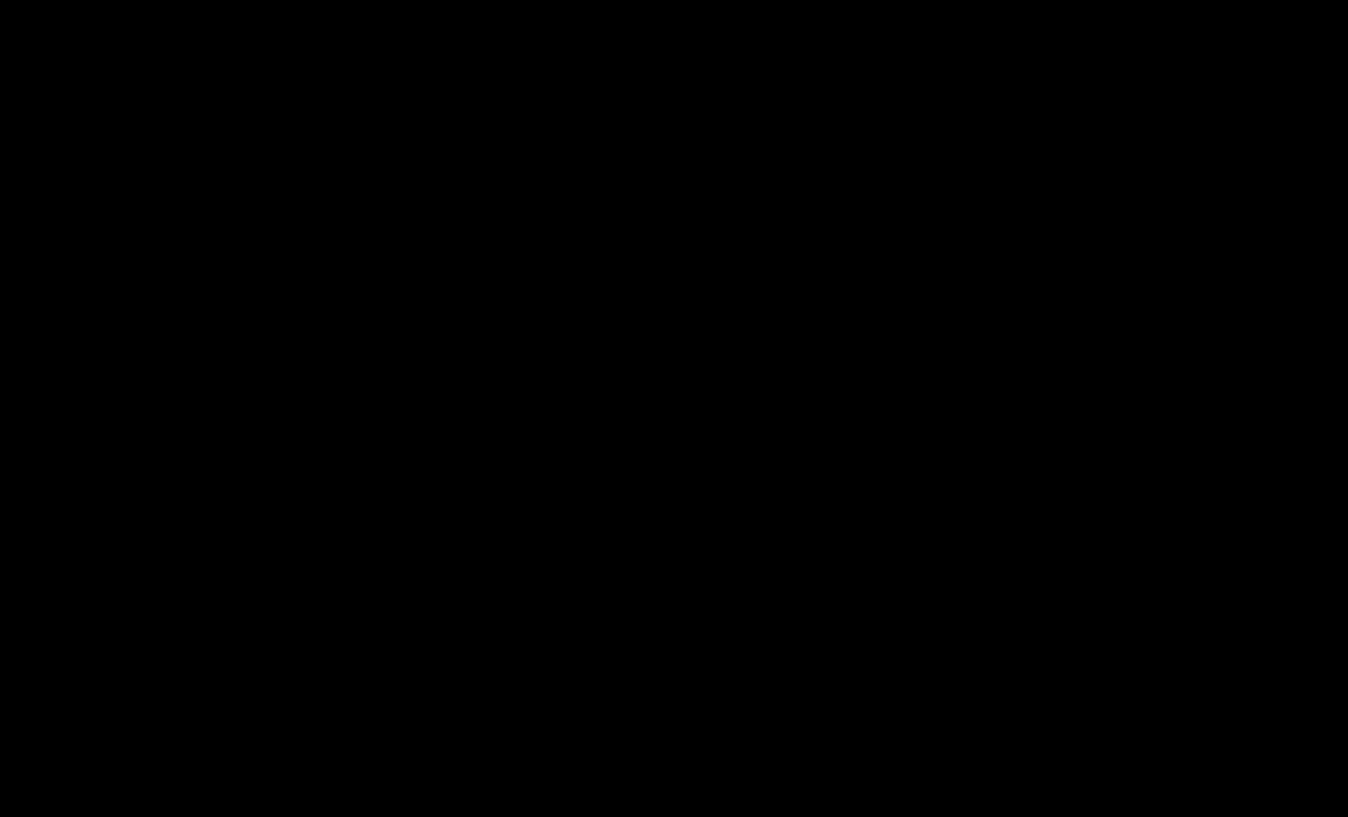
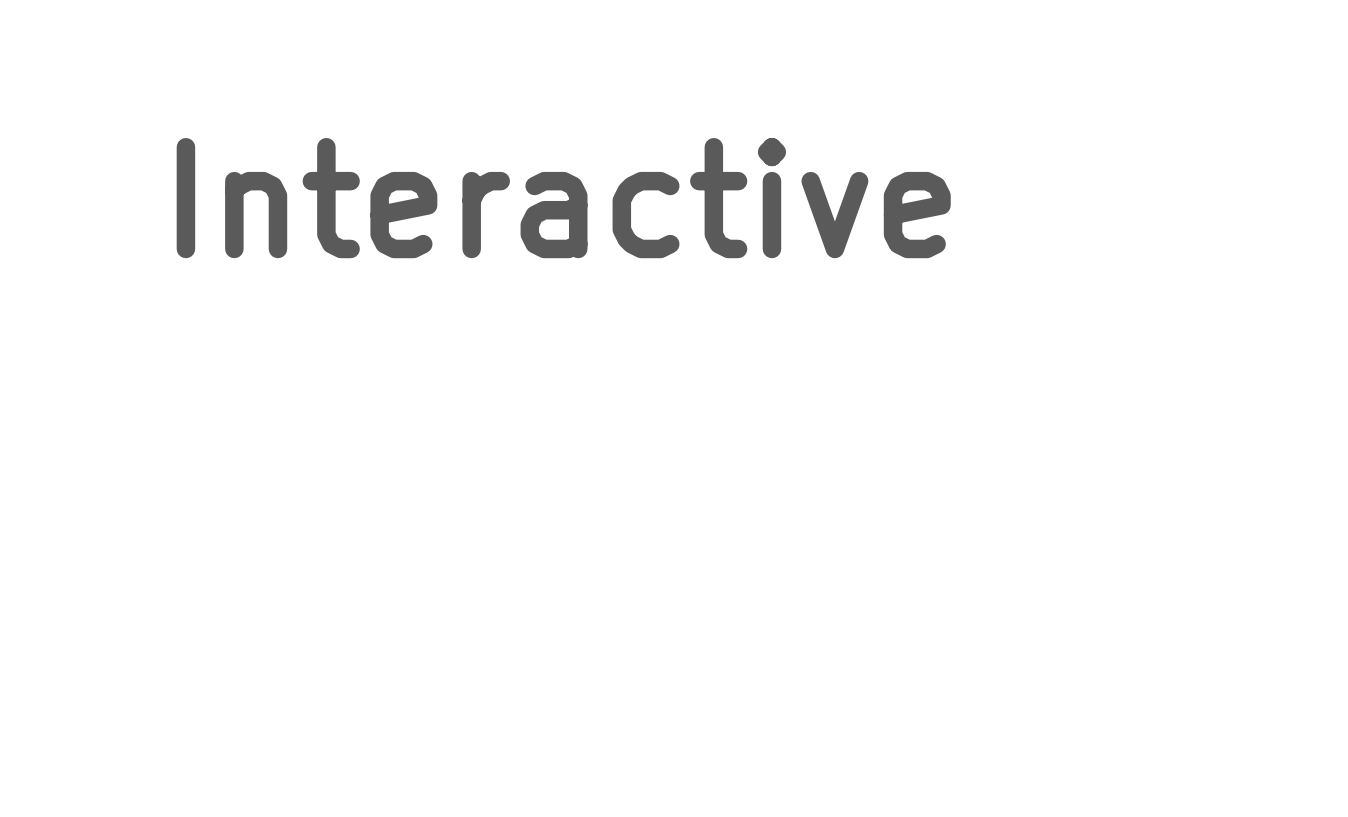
text: none -> Interactive (563, 198)

